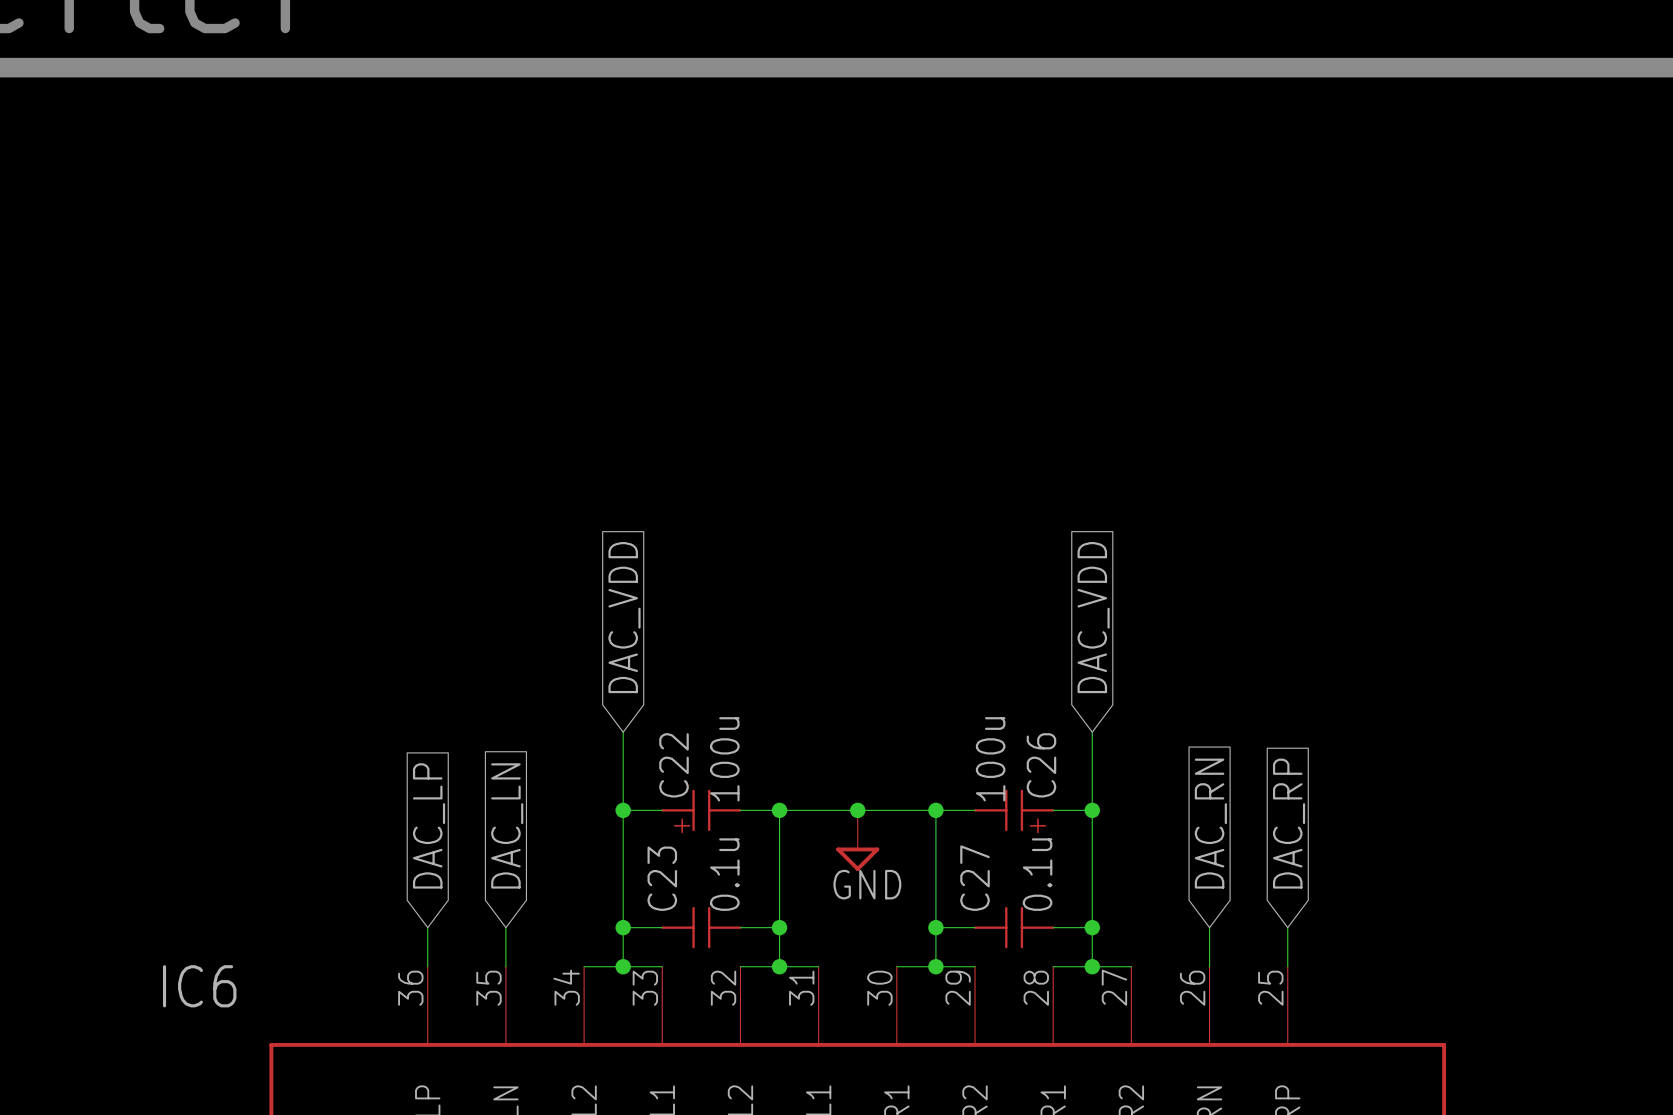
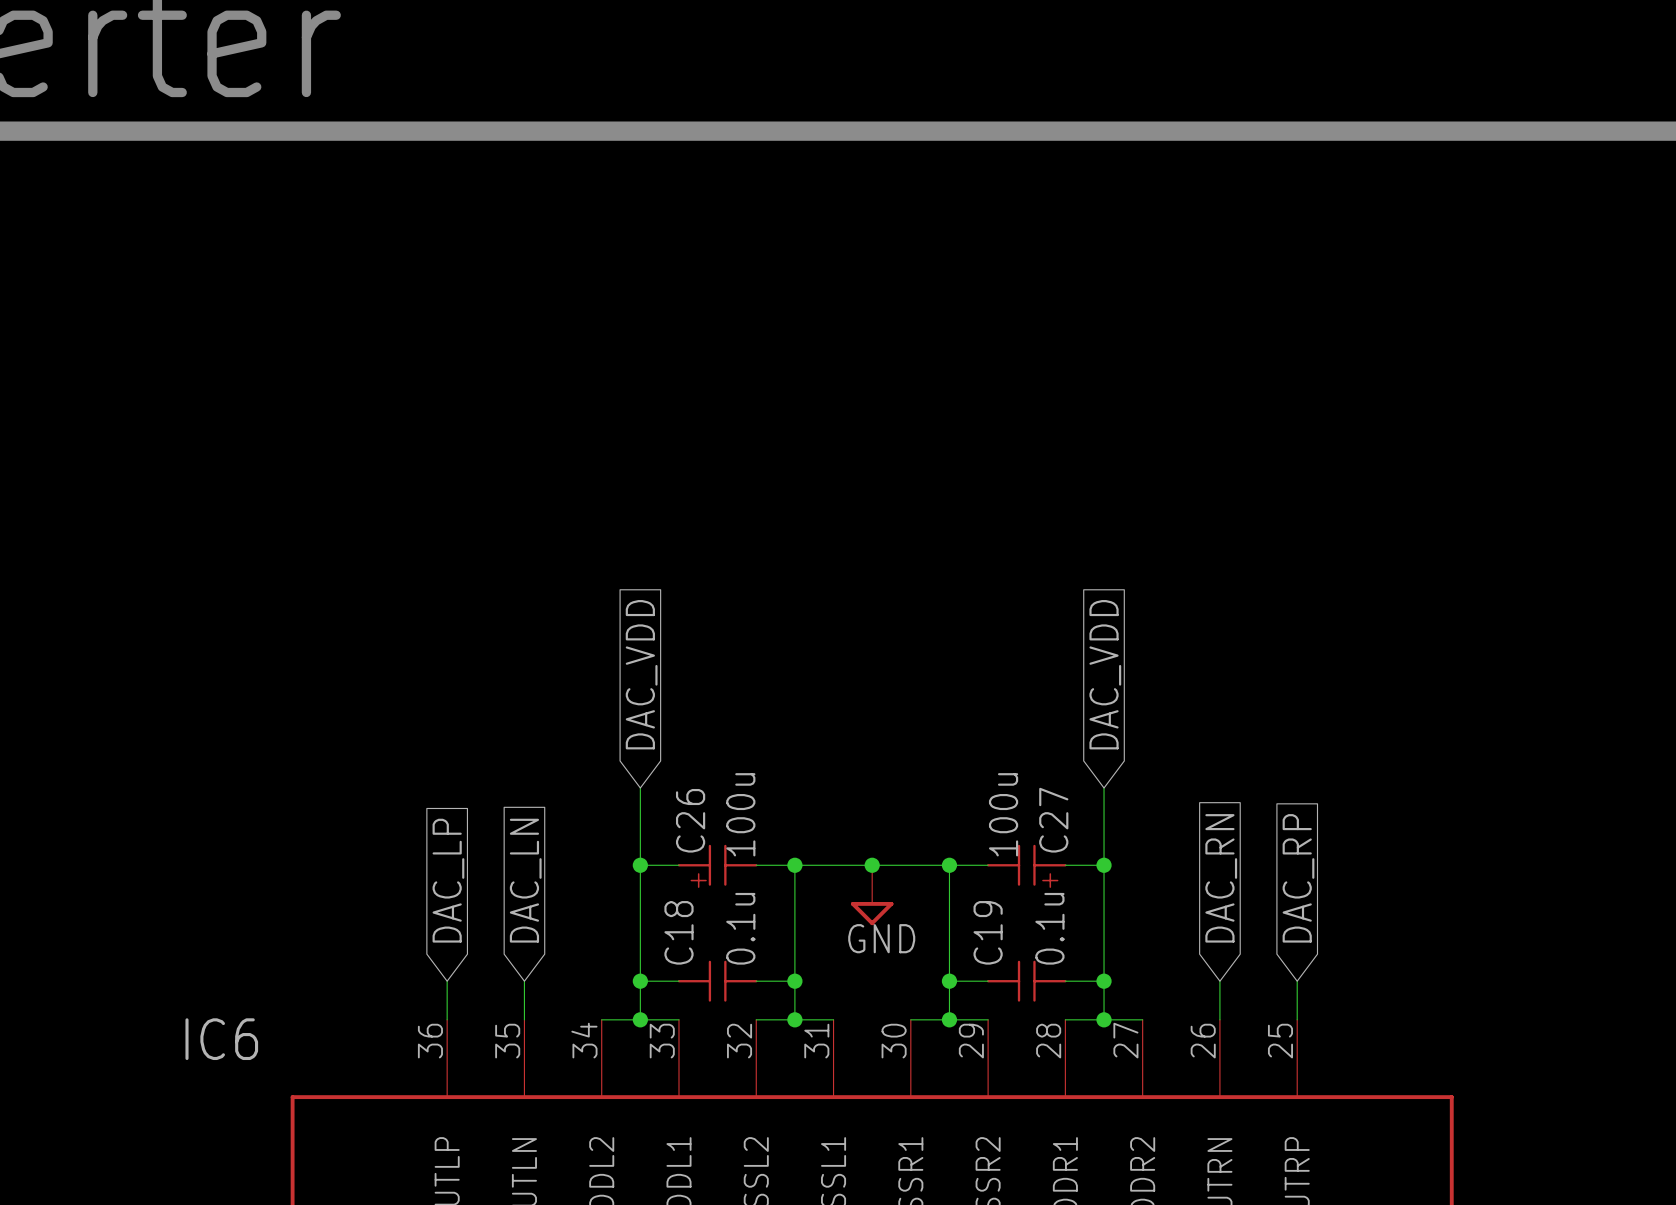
C22 name: C22 (674, 765) -> C26 (690, 820)
C26 name: C26 (1041, 765) -> C27 (1053, 820)
C23 name: C23 (662, 878) -> C18 (678, 932)
C27 name: C27 (975, 878) -> C19 (988, 932)

